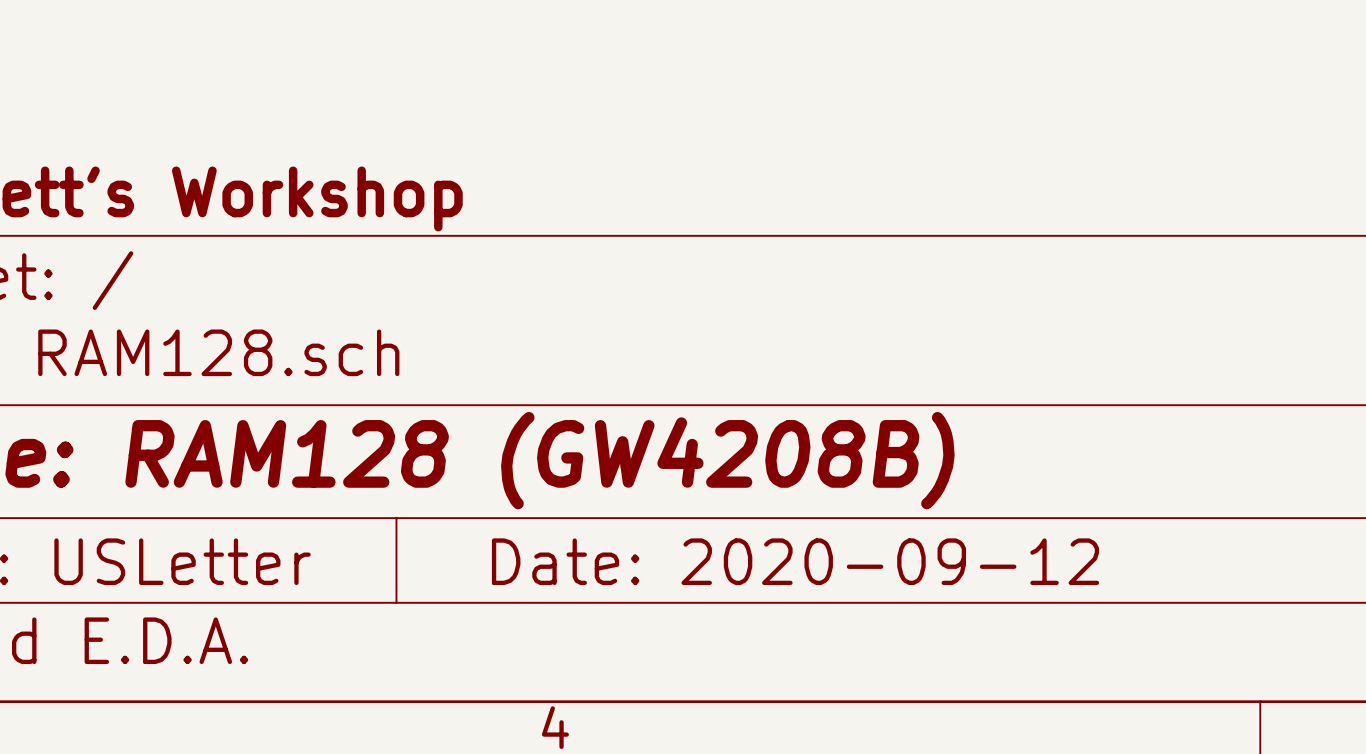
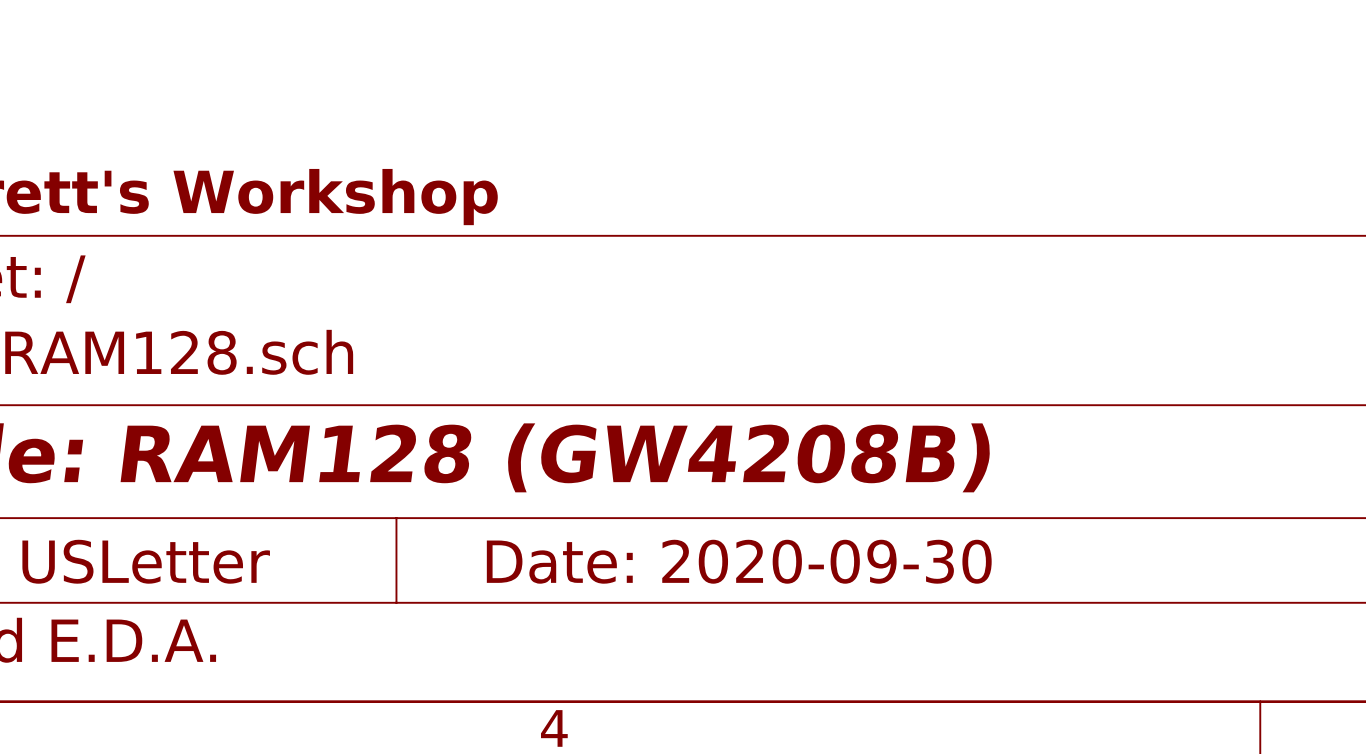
title block: Date: 2020-09-12 (795, 561) -> Date: 2020-09-30 (739, 561)

